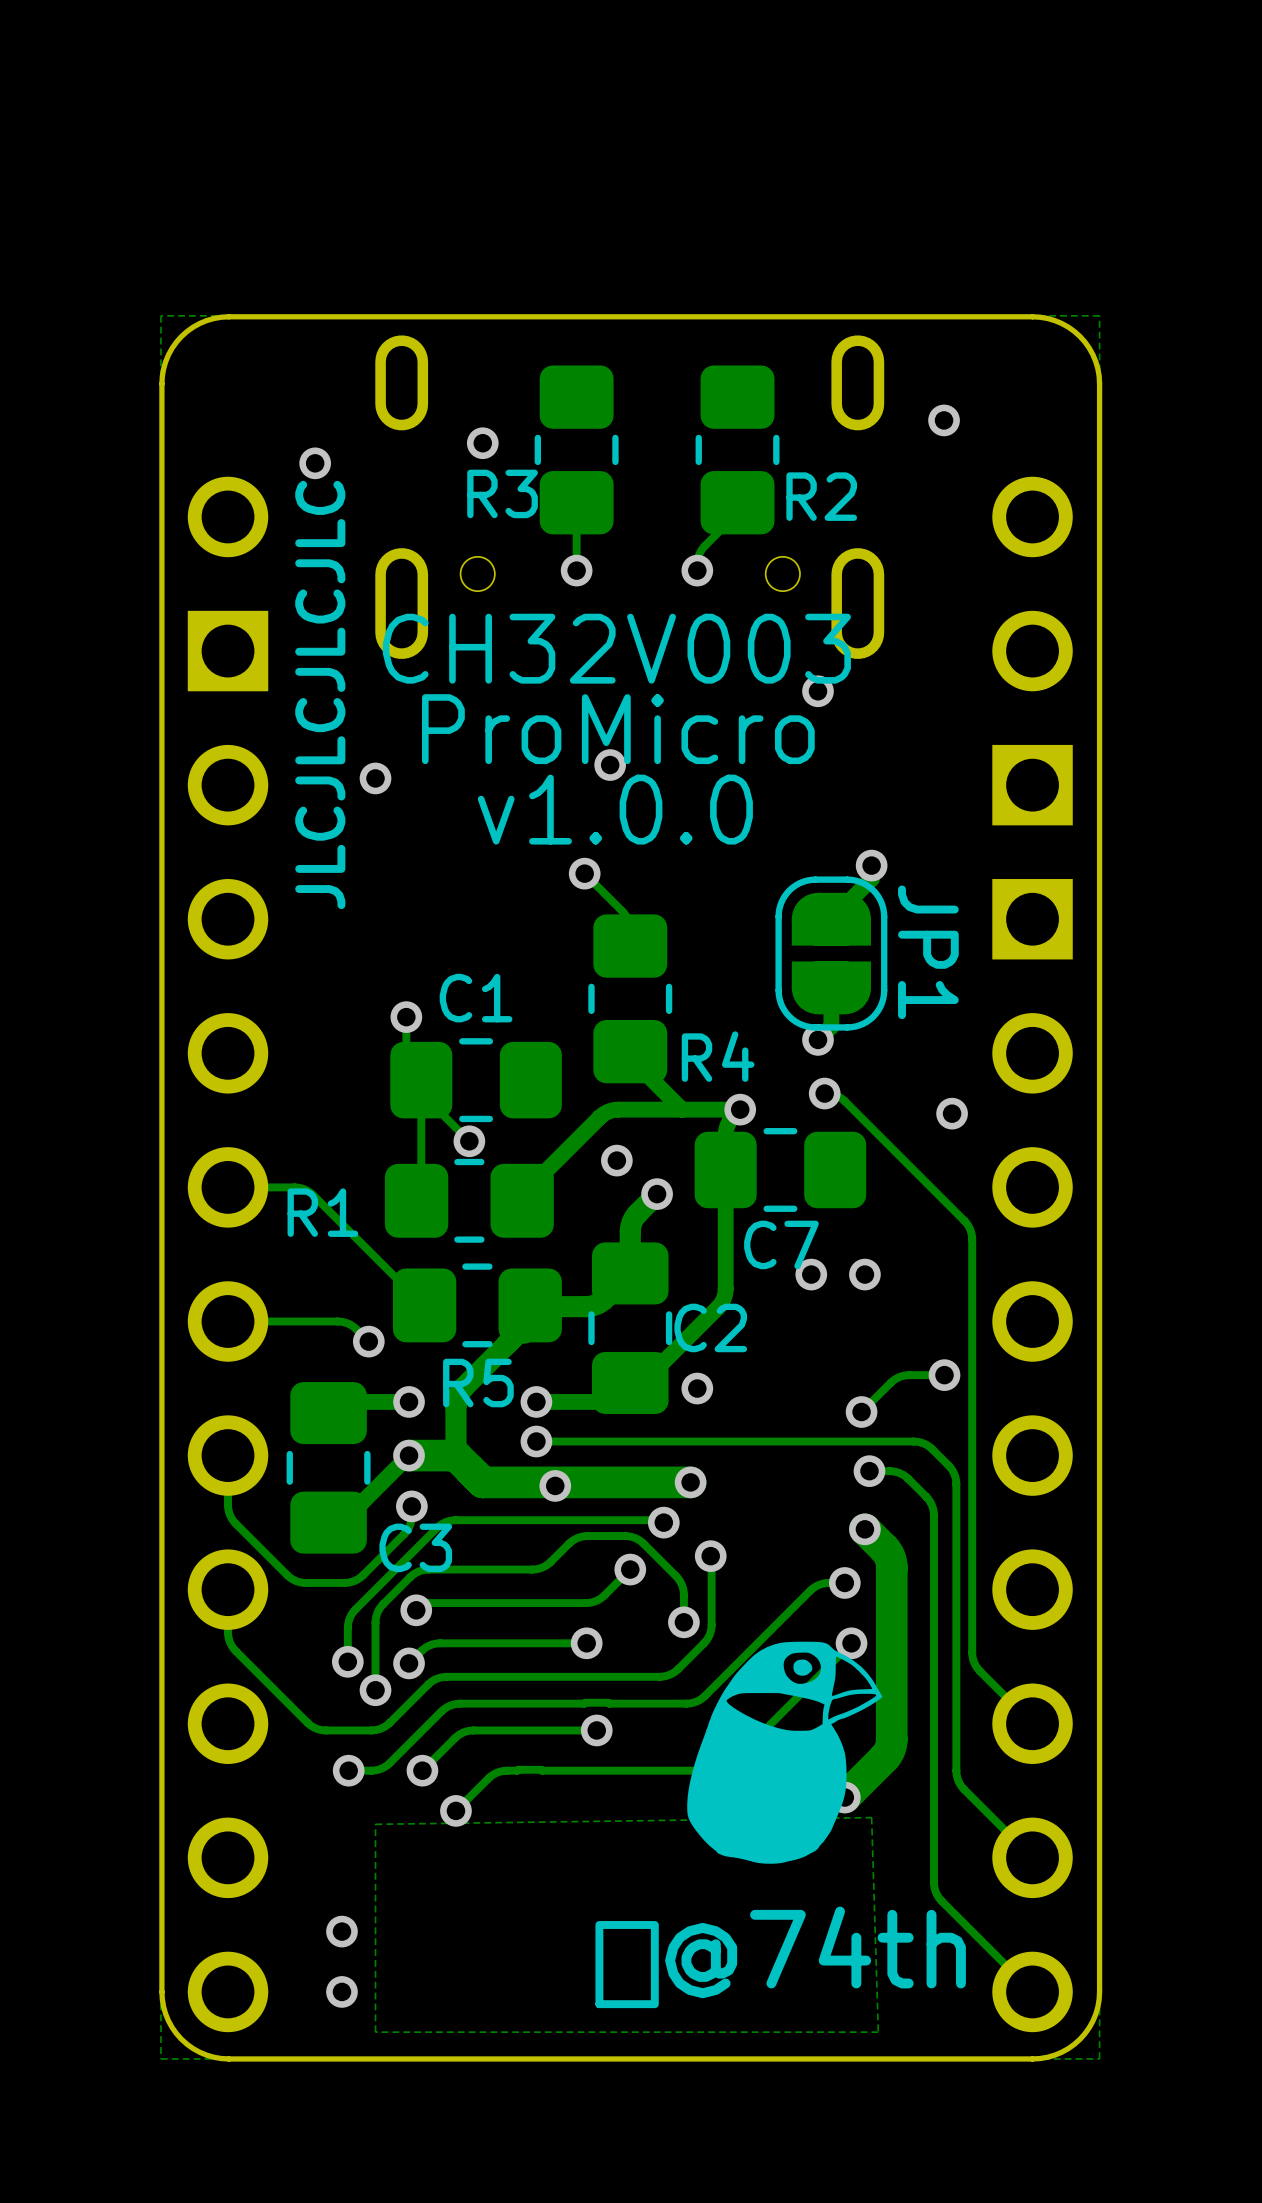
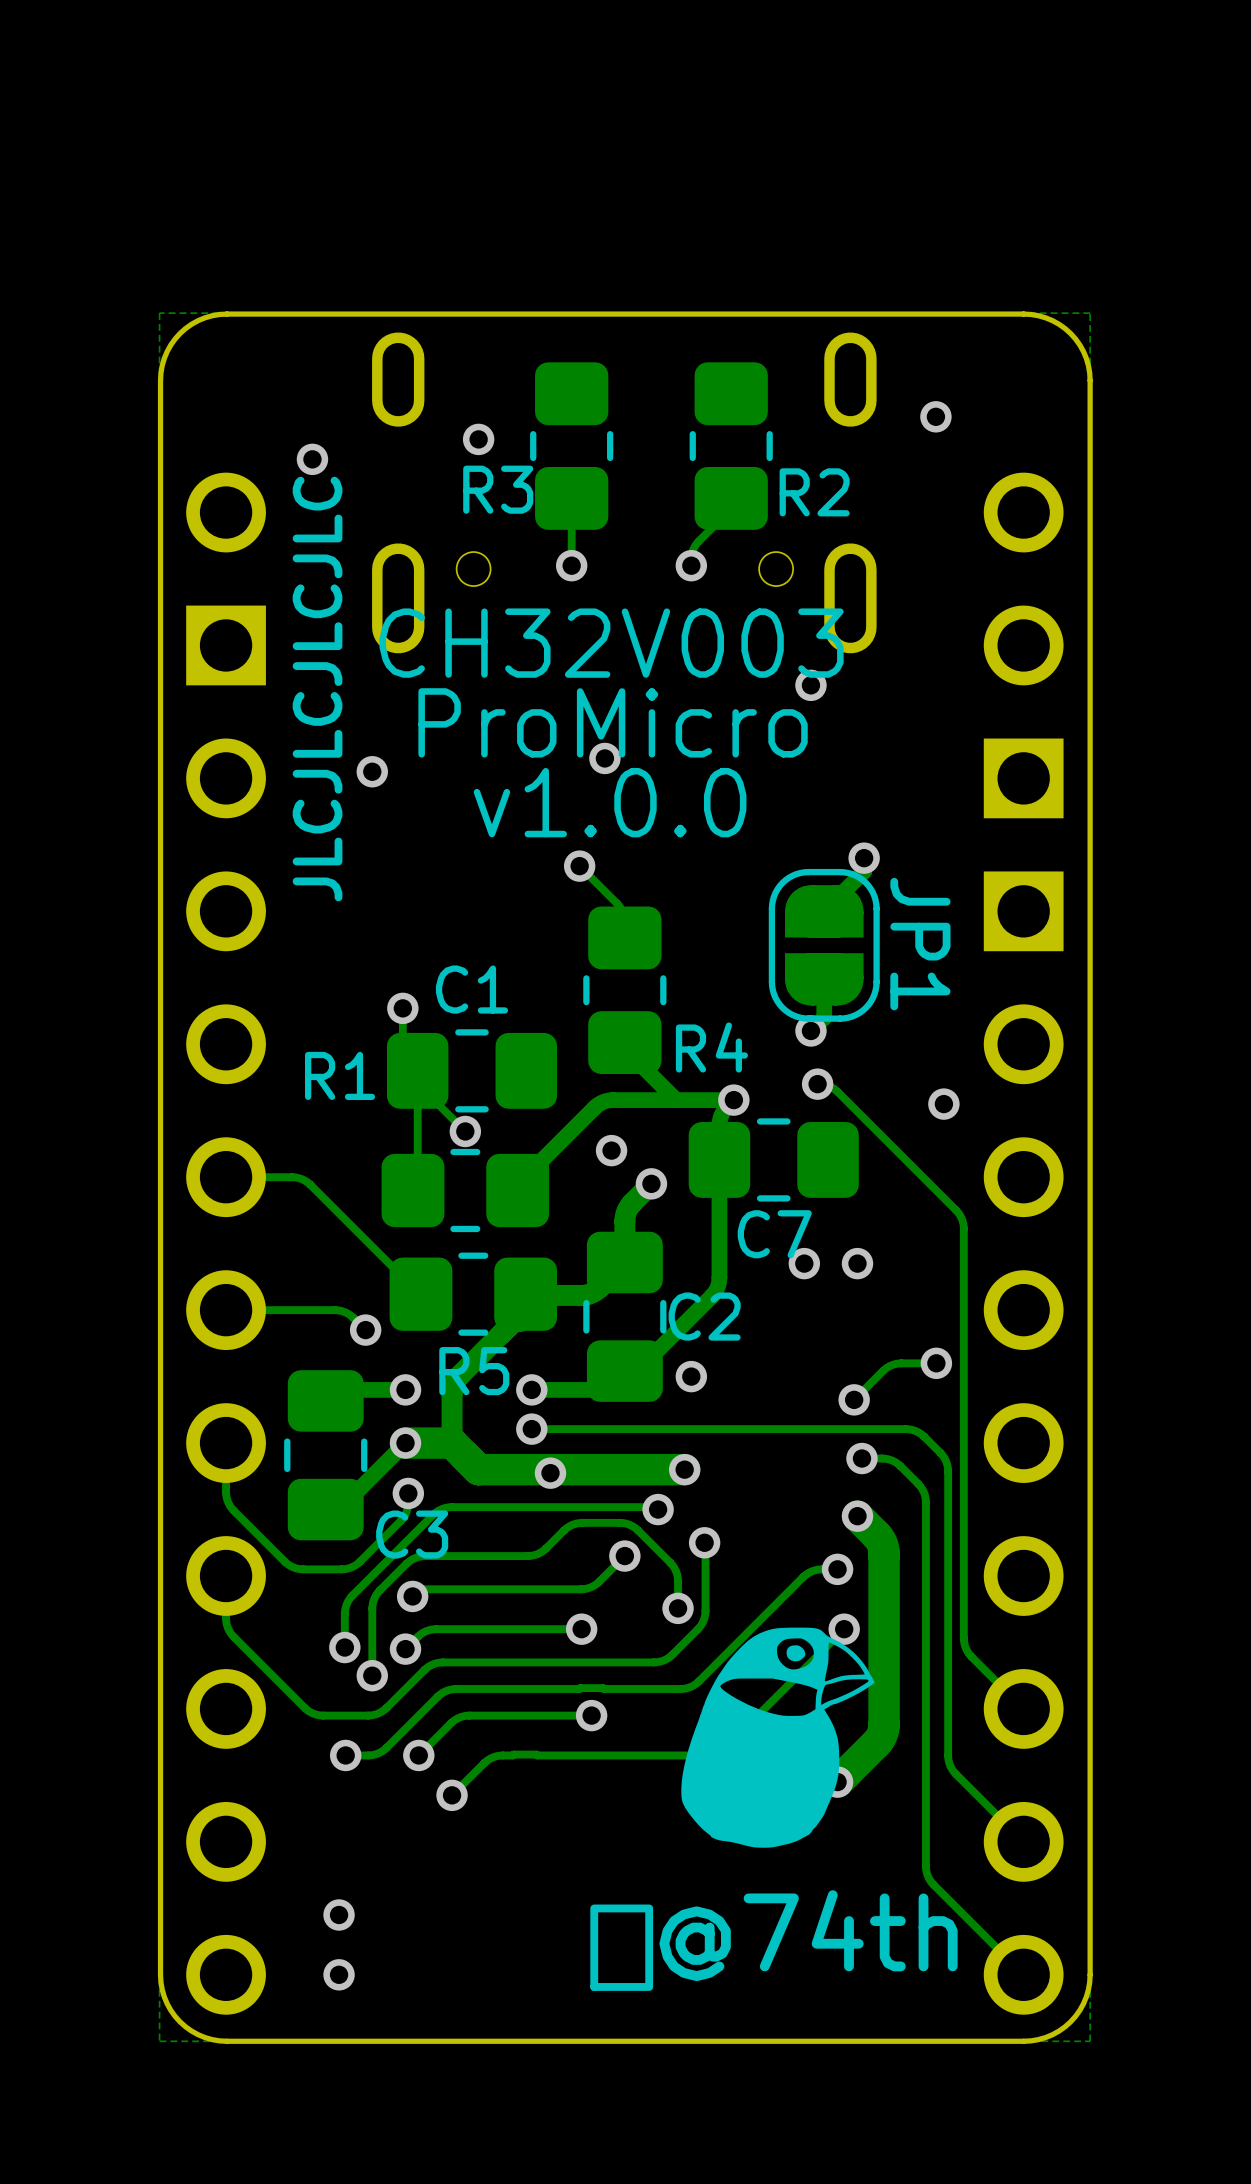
R1 name position: R1 (322, 1212) -> R1 (340, 1075)
zone outline: (871, 1817) (375, 1824) (375, 2032) (878, 2032) (871, 1817) -> none

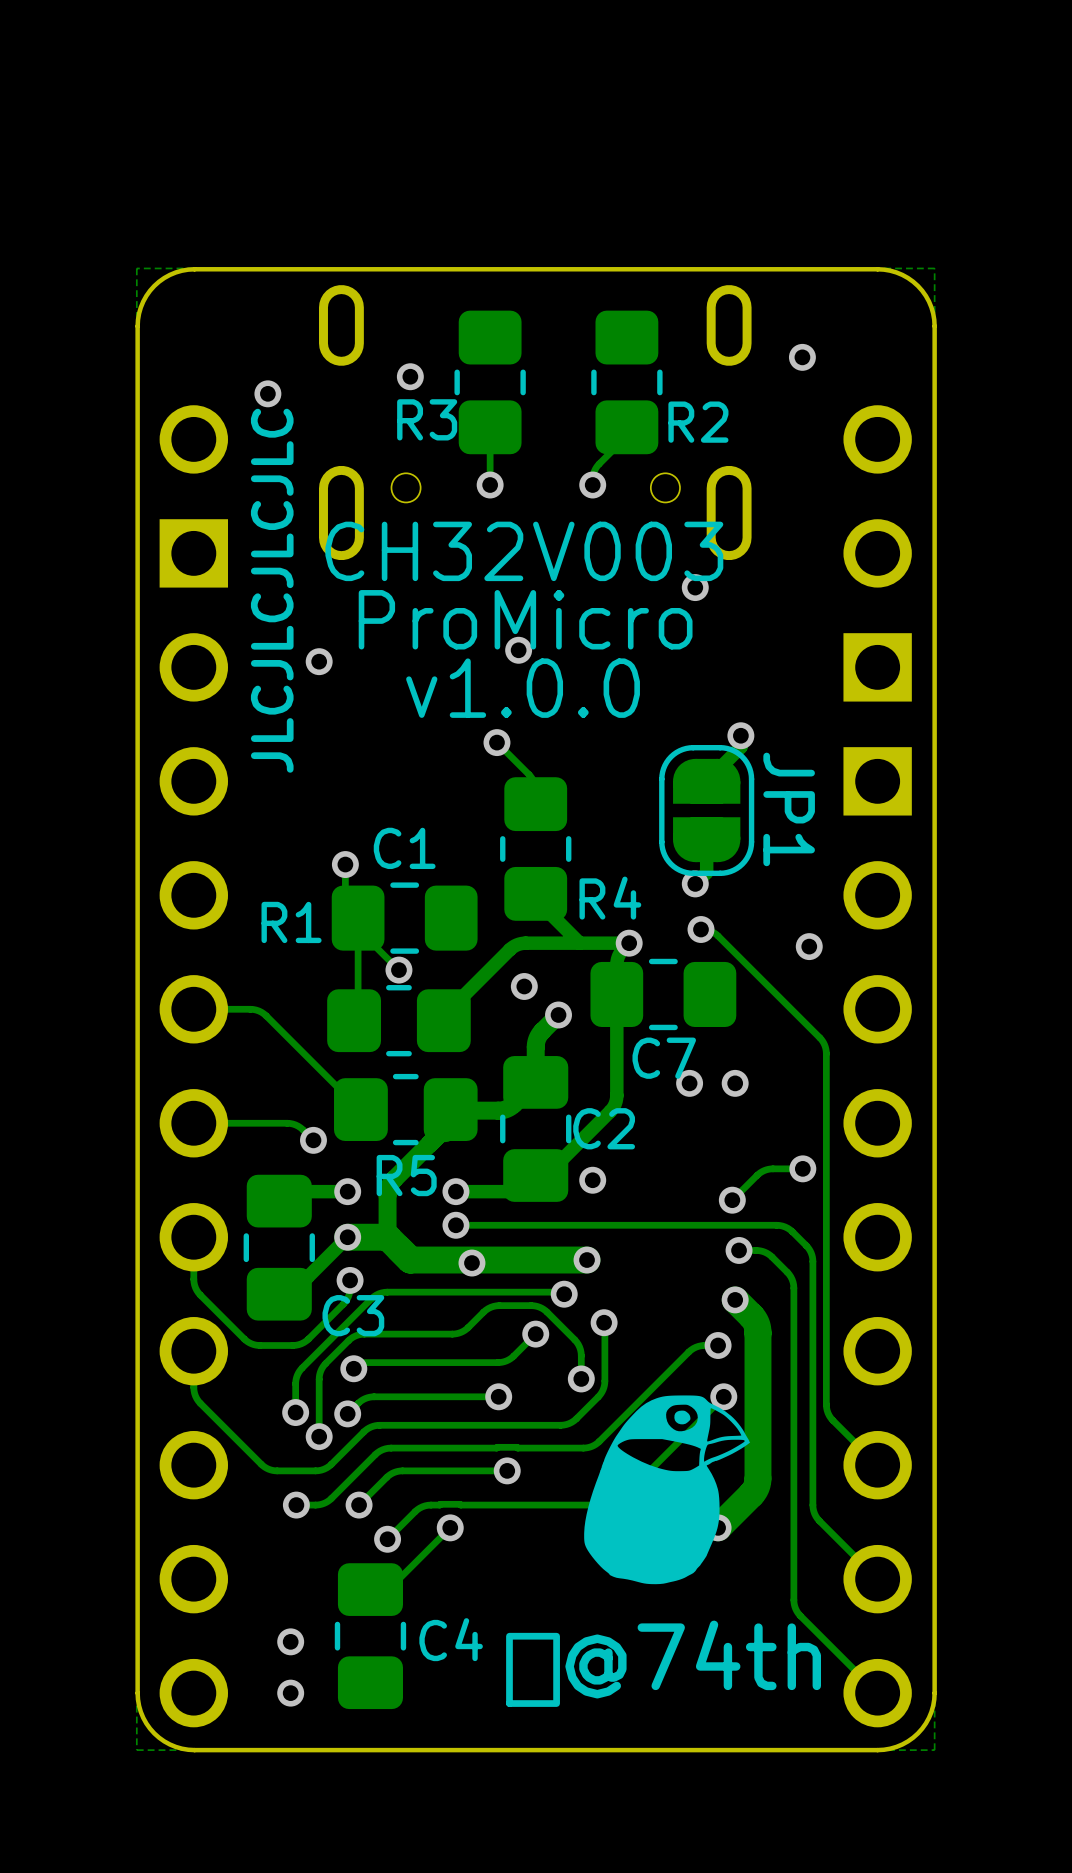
track: none -> (450, 1527) (381, 1596) (376, 1596)
via: none -> (450, 1527)
C4: none -> (370, 1636)

